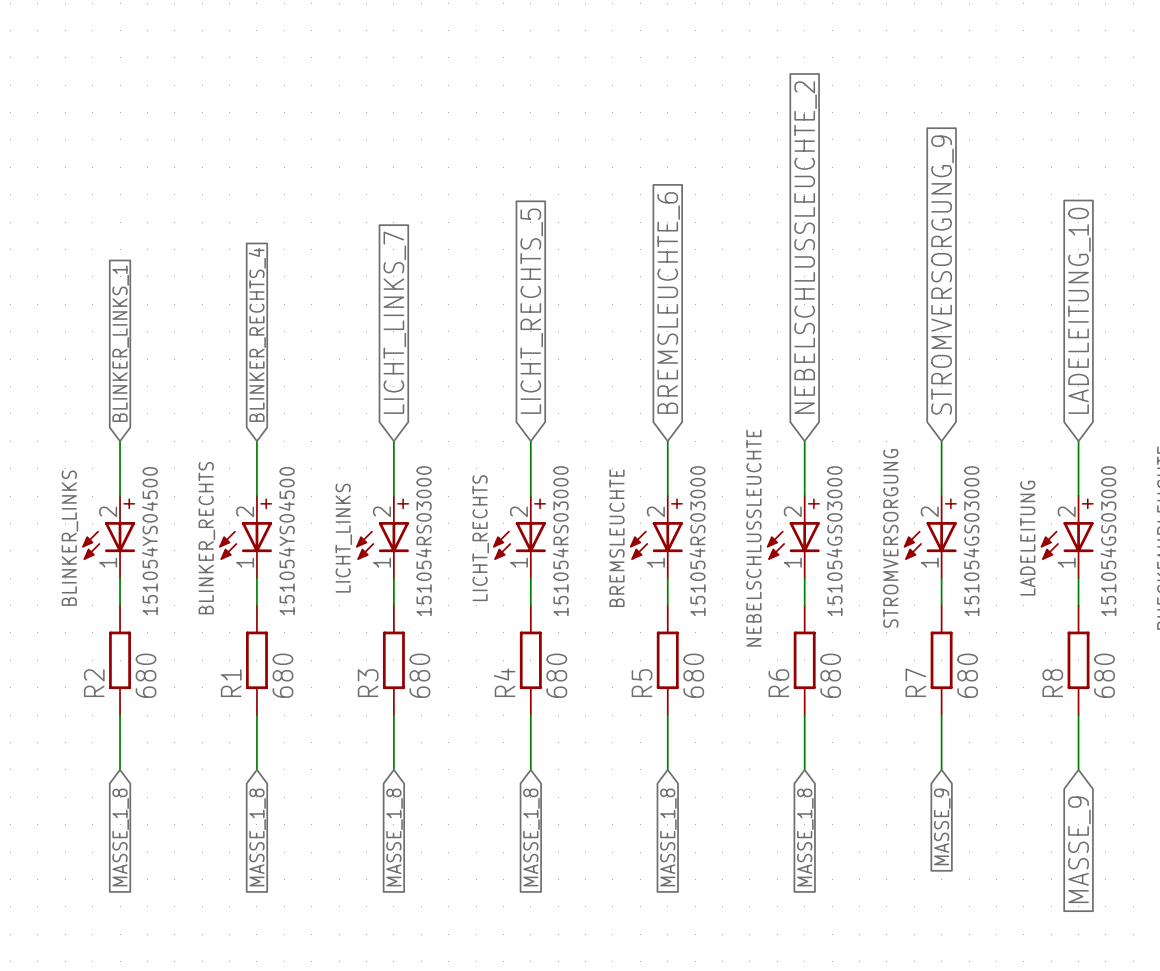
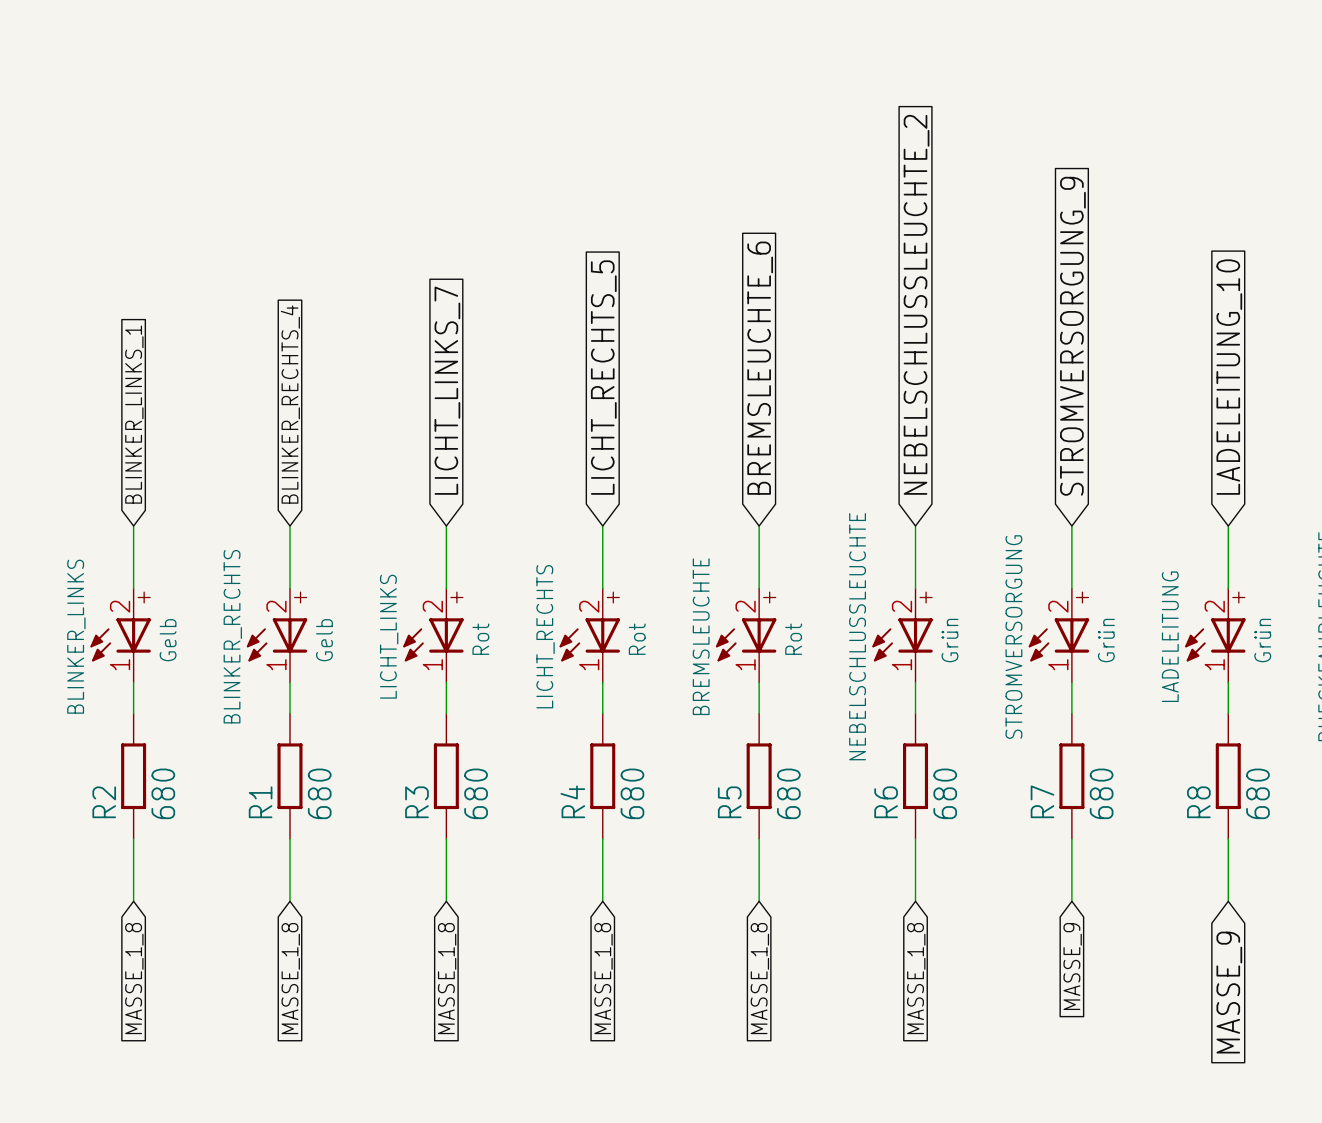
BLINKER_LINKS value: 151054YS04500 (149, 541) -> Gelb (168, 640)
BLINKER_RECHTS value: 151054YS04500 (286, 541) -> Gelb (324, 640)
LICHT_LINKS value: 151054RS03000 (423, 541) -> Rot (480, 639)
LICHT_RECHTS value: 151054RS03000 (560, 541) -> Rot (637, 639)
BREMSLEUCHTE value: 151054RS03000 (697, 541) -> Rot (793, 639)
NEBELSCHLUSSLEUCHTE value: 151054GS03000 (834, 541) -> Grün (950, 640)
STROMVERSORGUNG value: 151054GS03000 (971, 541) -> Grün (1106, 640)
LADELEITUNG value: 151054GS03000 (1108, 541) -> Grün (1262, 640)

